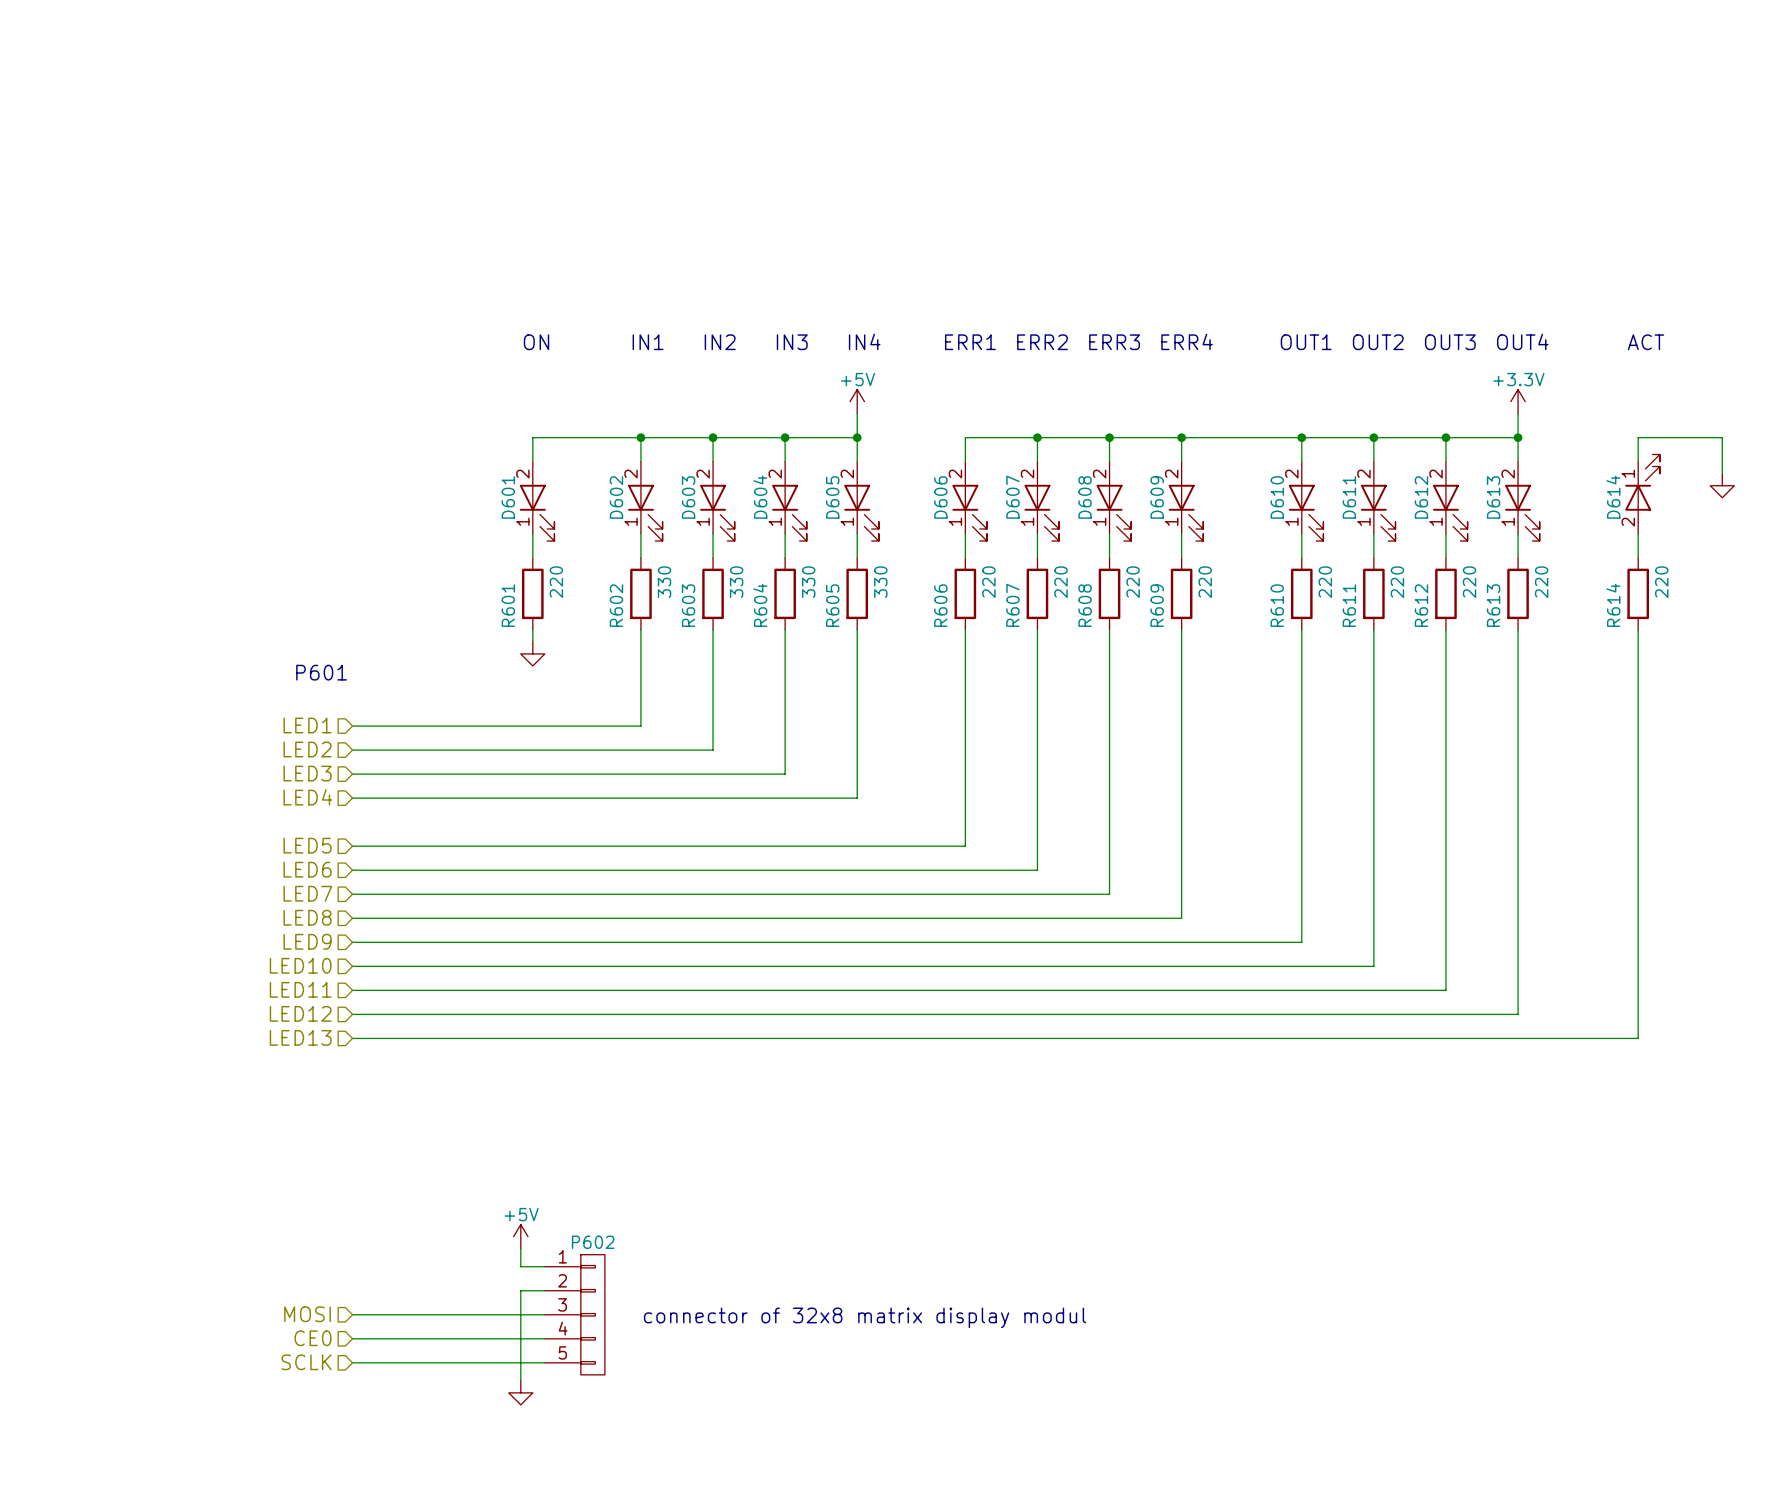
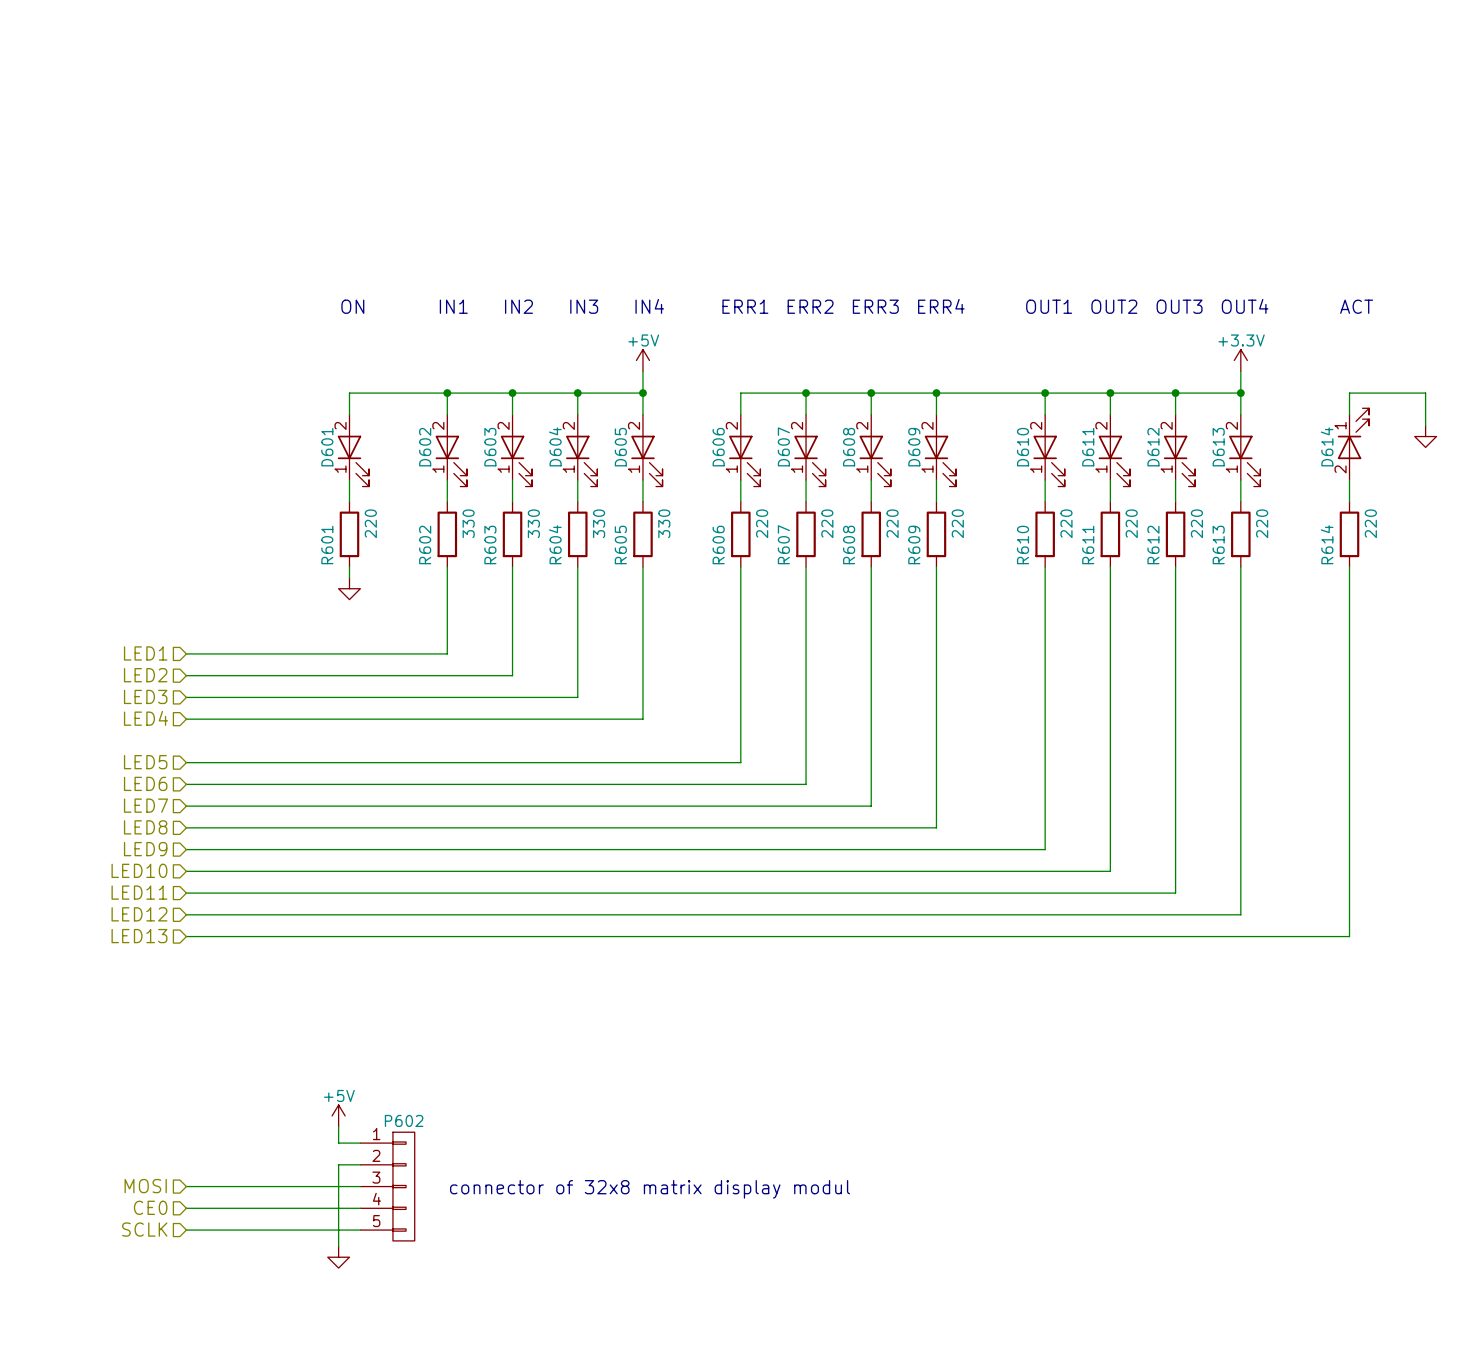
text: P601 (321, 672) -> none

